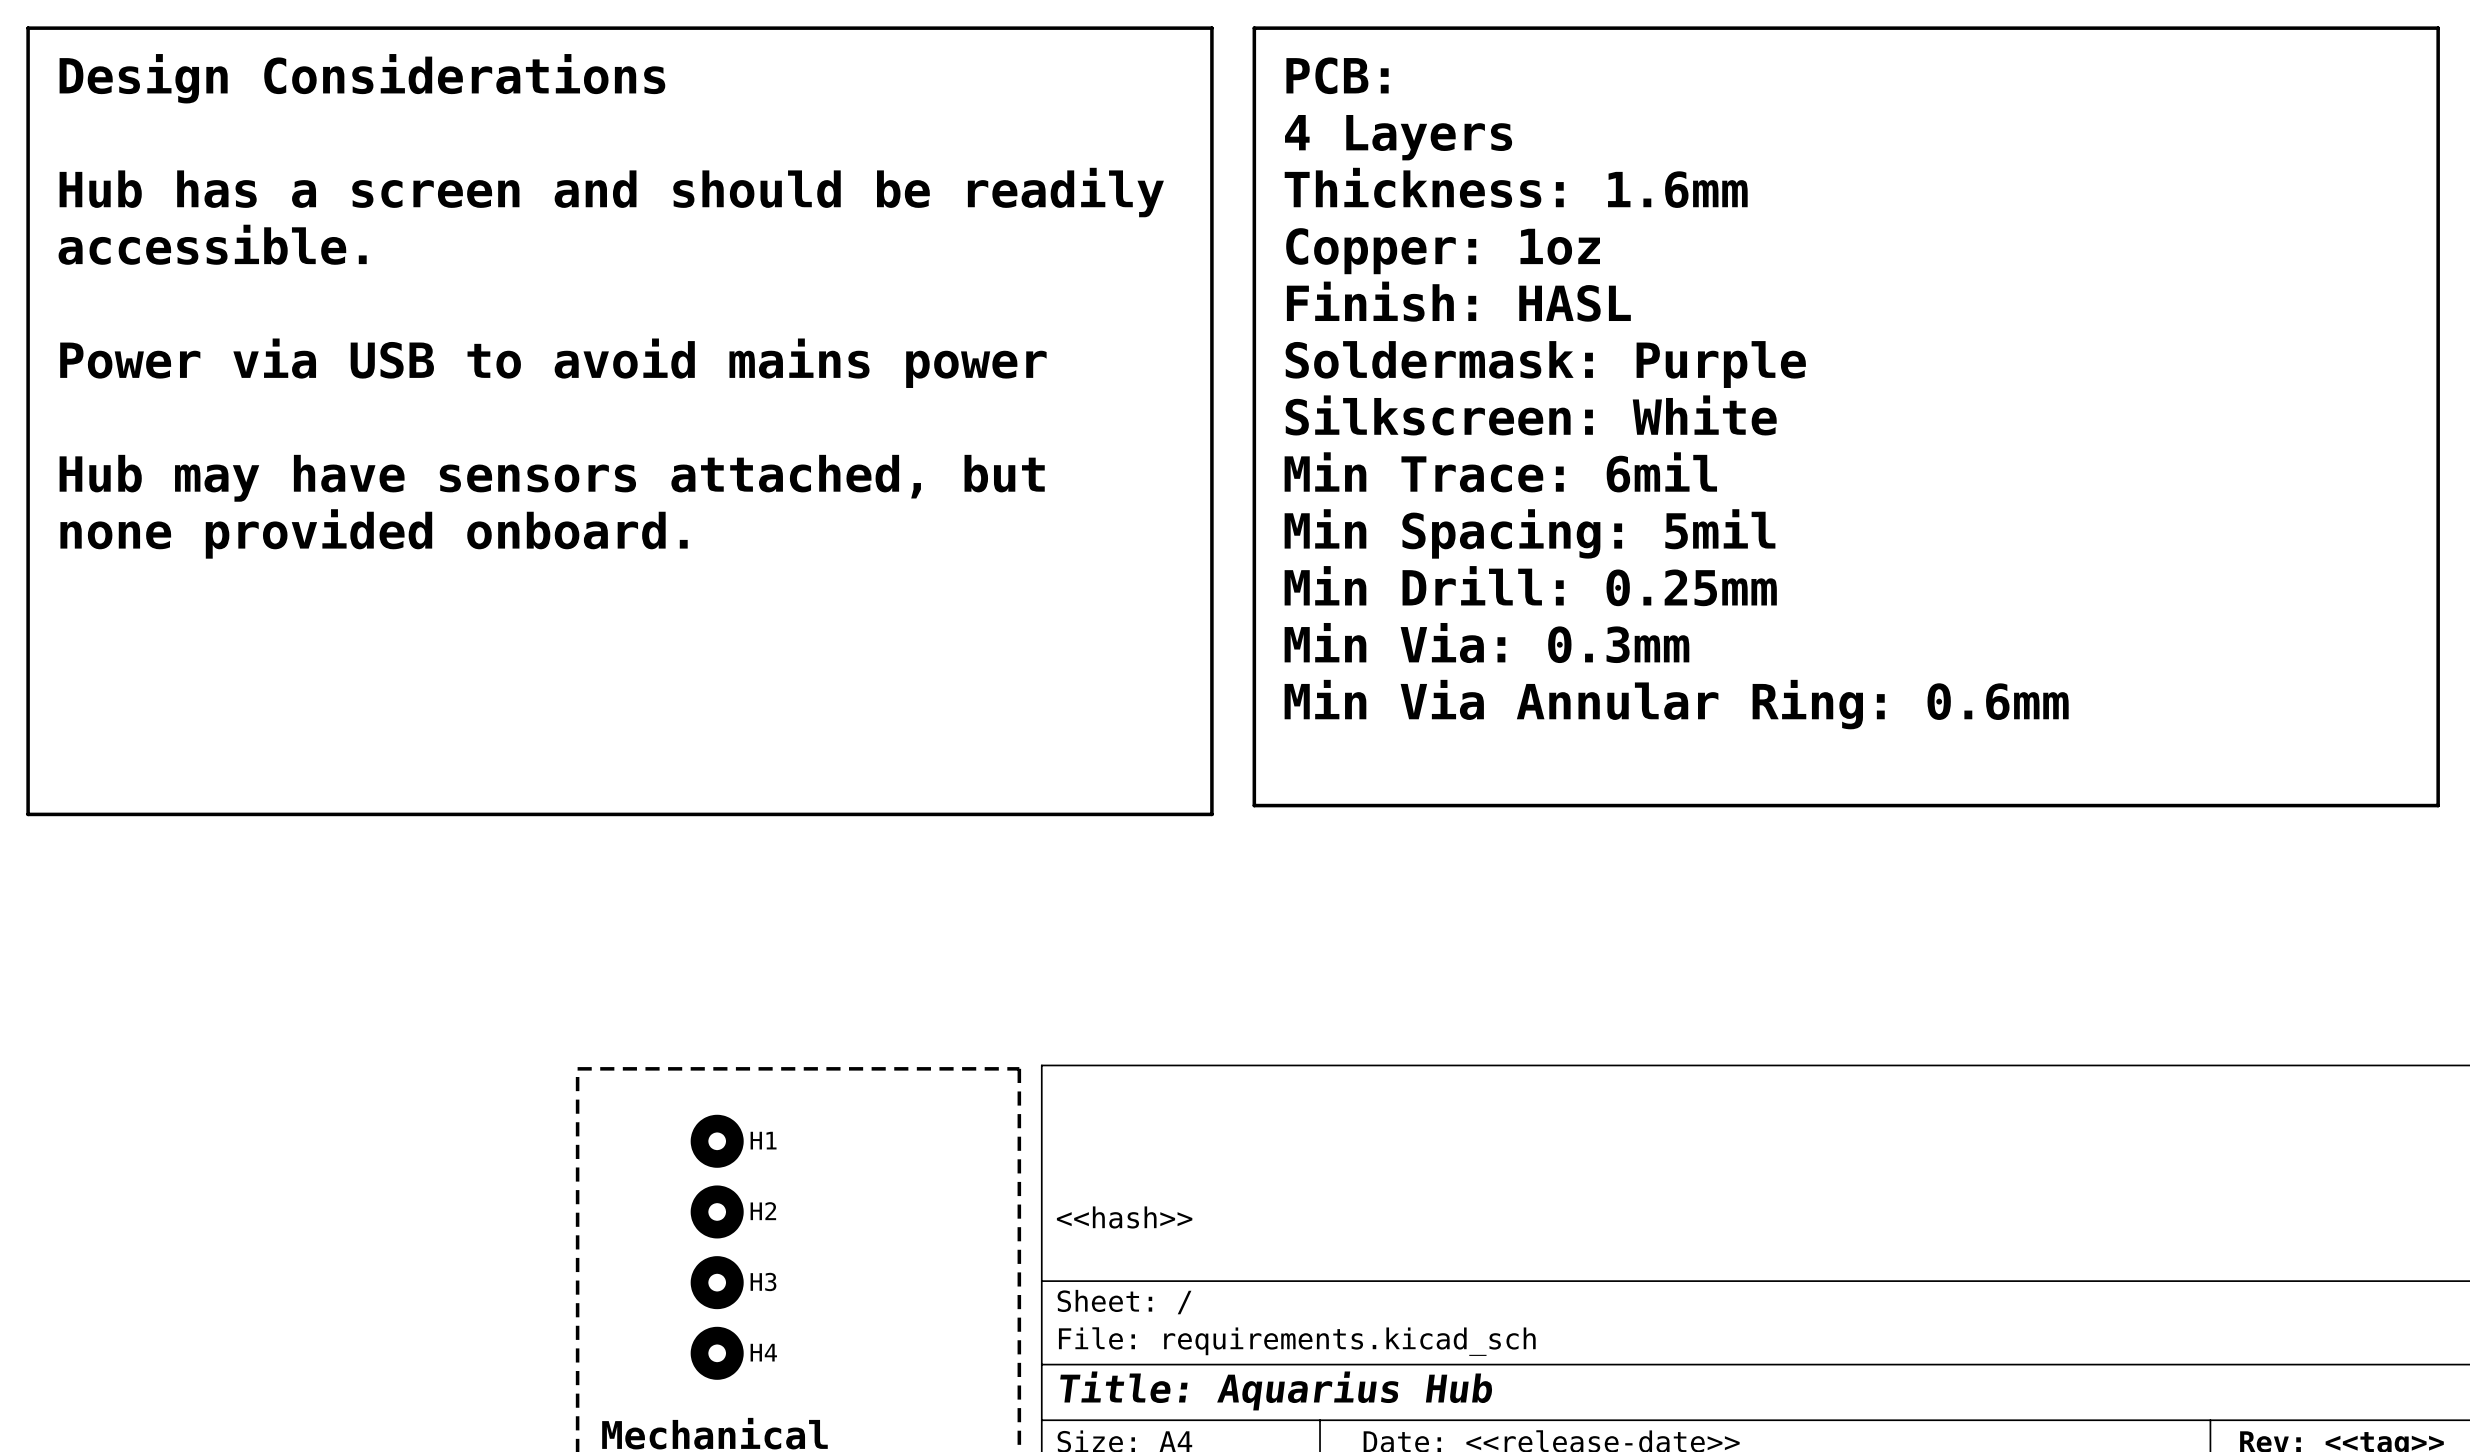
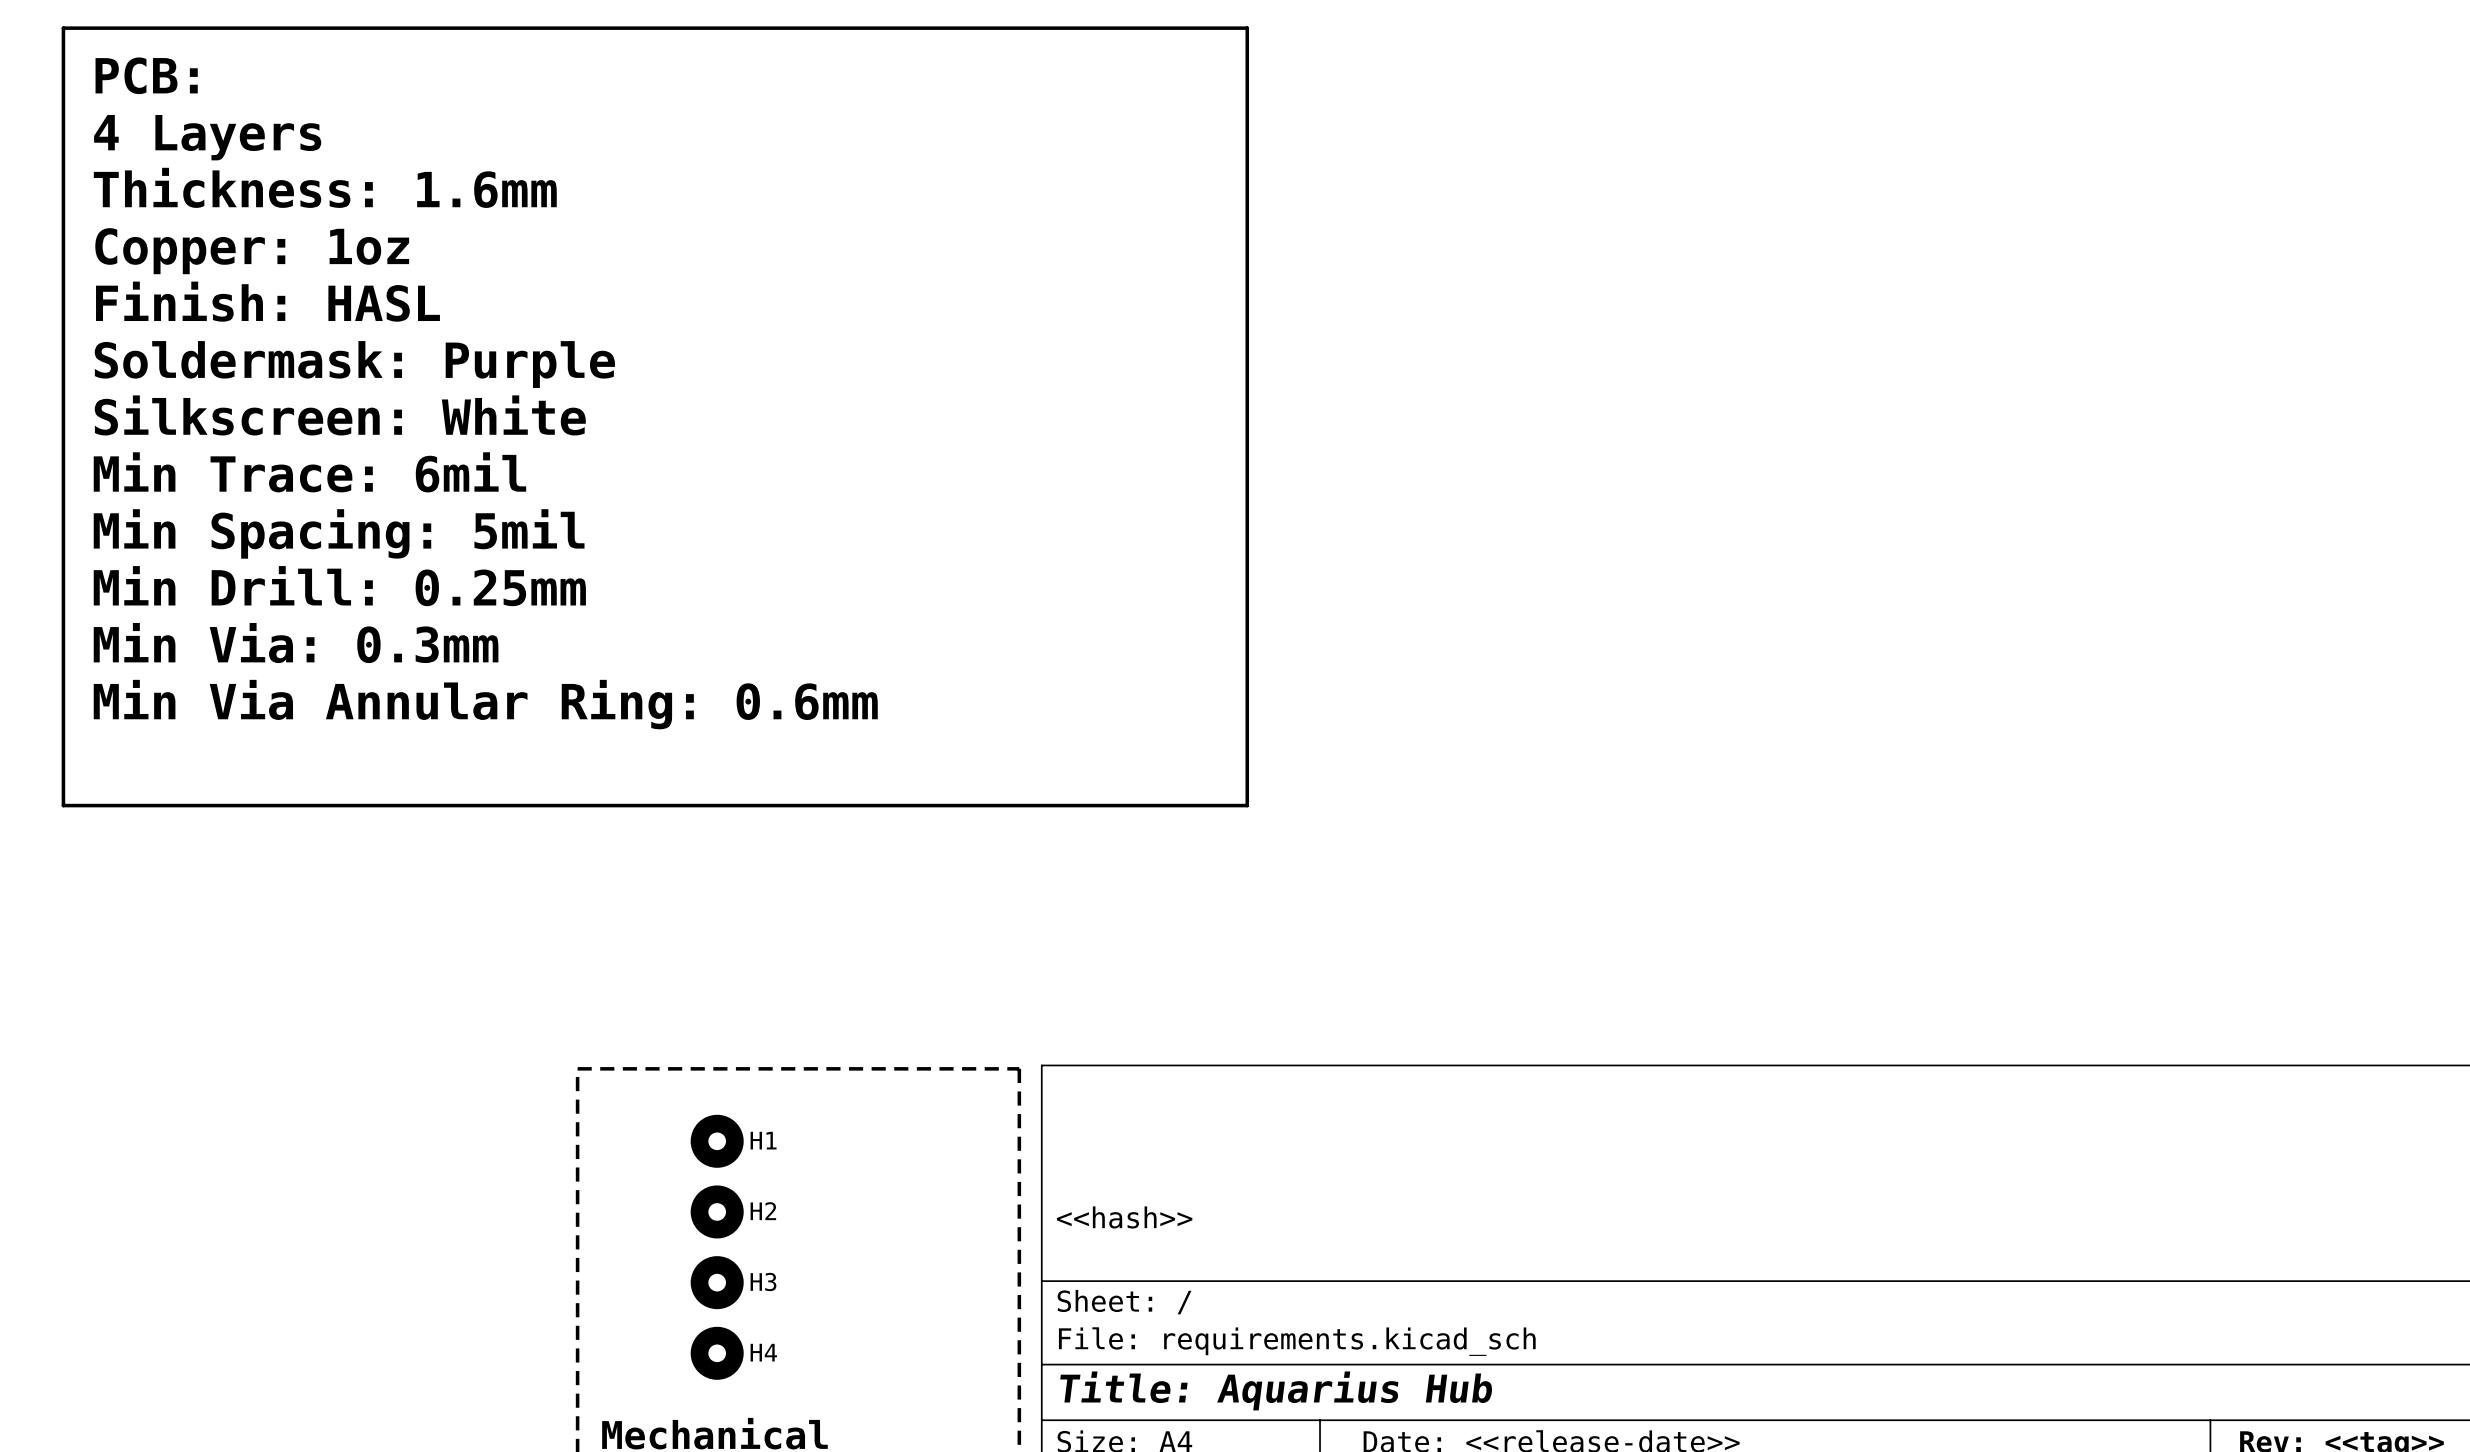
line: (63, 28) (28, 28) (28, 814) (1211, 814) (1211, 28) -> (63, 28) (63, 805) (1247, 805) (1247, 28) (1211, 28)
line: (1254, 28) (2438, 28) (2438, 805) (1254, 805) (1254, 28) -> none
text: none -> PCB: (146, 75)
text: PCB: (1337, 75) -> none
text: Design Considerations (362, 78) -> none
text: none -> 4 Layers (207, 137)
text: 4 Layers (1398, 137) -> none
text: none -> Thickness: 1.6mm (325, 187)
text: Thickness: 1.6mm (1516, 187) -> none
text: Hub has a screen and should be readily (611, 192) -> none
text: accessible. (212, 244) -> none
text: none -> Copper: 1oz (252, 251)
text: Copper: 1oz (1443, 251) -> none
text: none -> Finish: HASL (267, 301)
text: Finish: HASL (1458, 301) -> none
text: Power via USB to avoid mains power (553, 363) -> none
text: none -> Soldermask: Purple (354, 364)
text: Soldermask: Purple (1545, 364) -> none
text: none -> Silkscreen: White (340, 415)
text: Silkscreen: White (1531, 415) -> none
text: none -> Min Trace: 6mil (309, 472)
text: Min Trace: 6mil (1500, 472) -> none
text: Hub may have sensors attached, but (552, 478) -> none
text: none -> Min Spacing: 5mil (339, 533)
text: none provided onboard. (374, 533) -> none
text: Min Spacing: 5mil (1530, 533) -> none
text: none -> Min Drill: 0.25mm (339, 586)
text: Min Drill: 0.25mm (1530, 586) -> none
text: none -> Min Via: 0.3mm (296, 643)
text: Min Via: 0.3mm (1486, 643) -> none
text: none -> Min Via Annular Ring: 0.6mm (485, 704)
text: Min Via Annular Ring: 0.6mm (1676, 704) -> none

